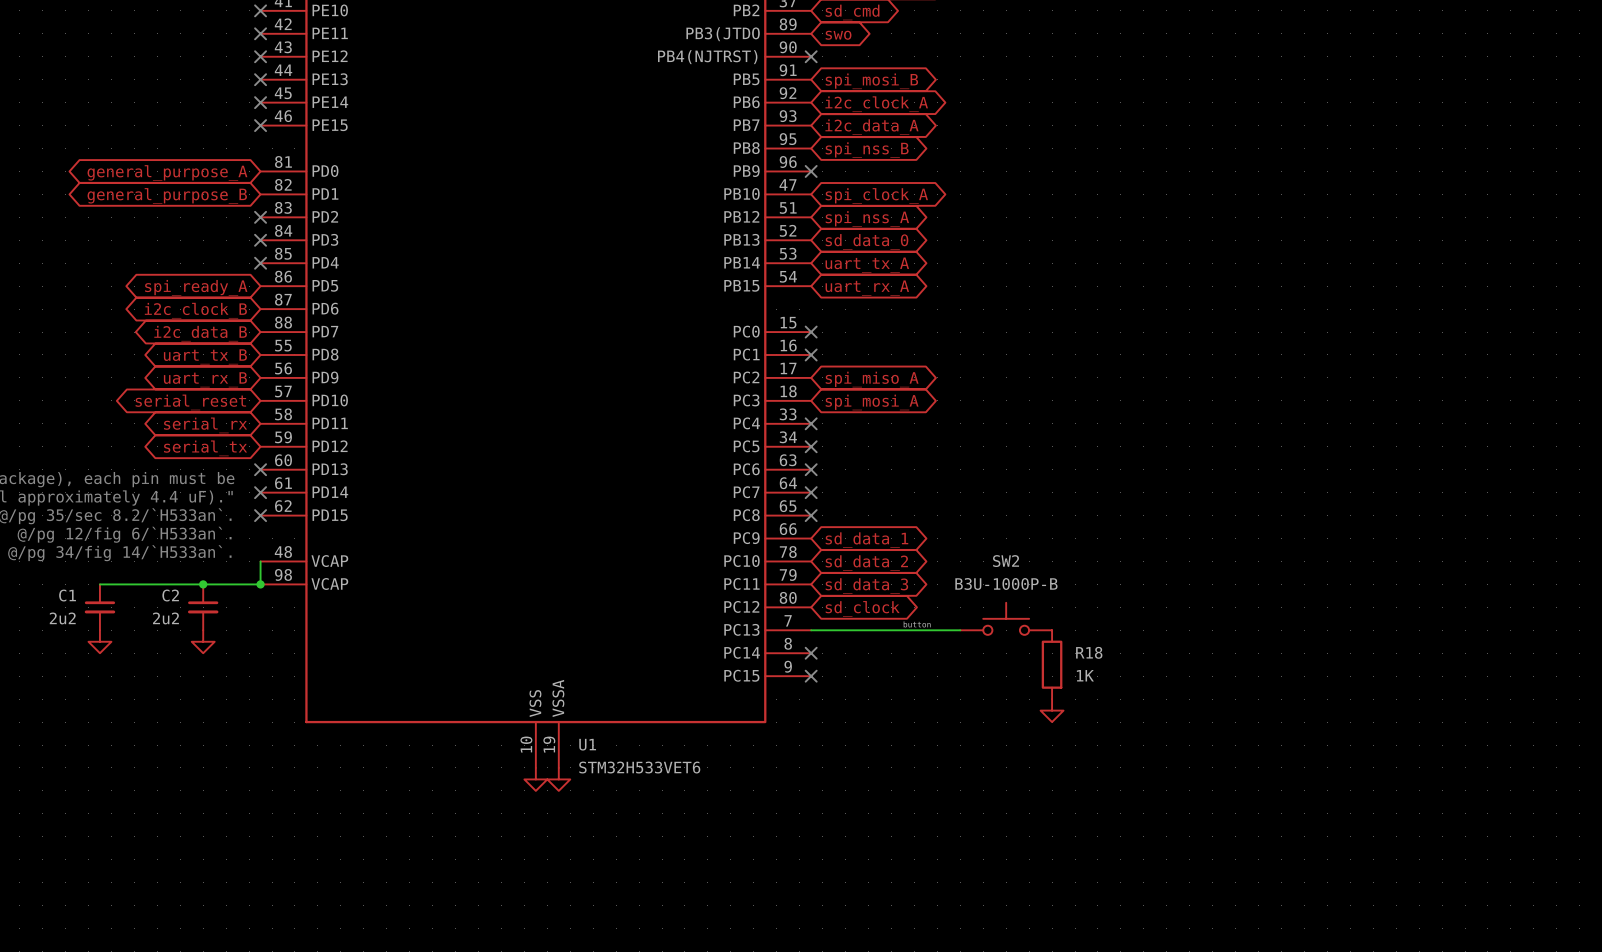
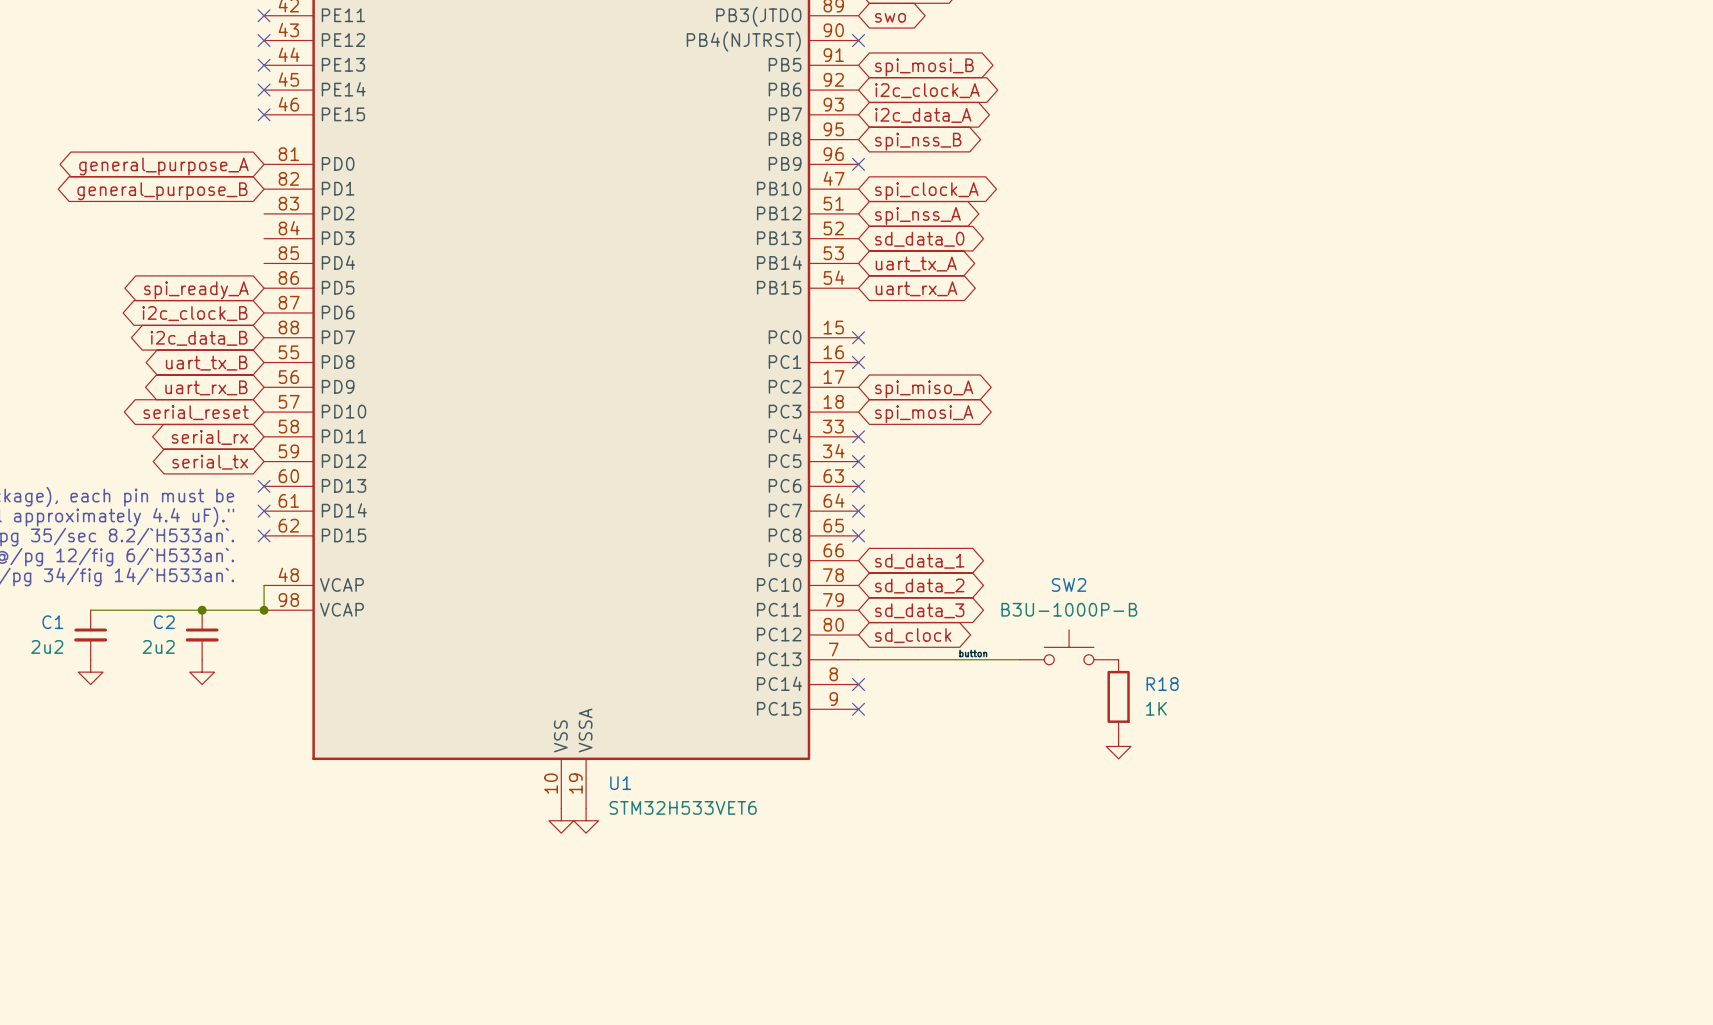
no-connect mark: (260, 217) -> none
no-connect mark: (260, 240) -> none
no-connect mark: (260, 263) -> none

